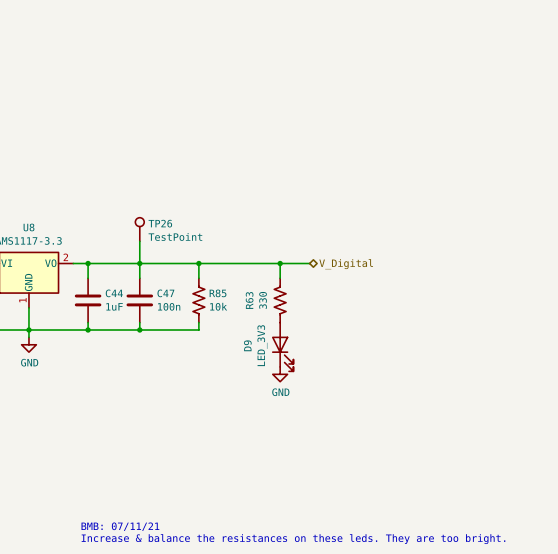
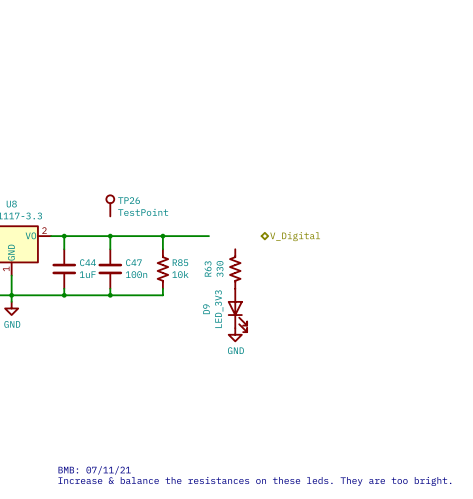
wire: (139, 241) (139, 263) -> none
wire: (250, 263) (309, 263) -> none
wire: (280, 263) (280, 278) -> none
junction: (280, 263) -> none

